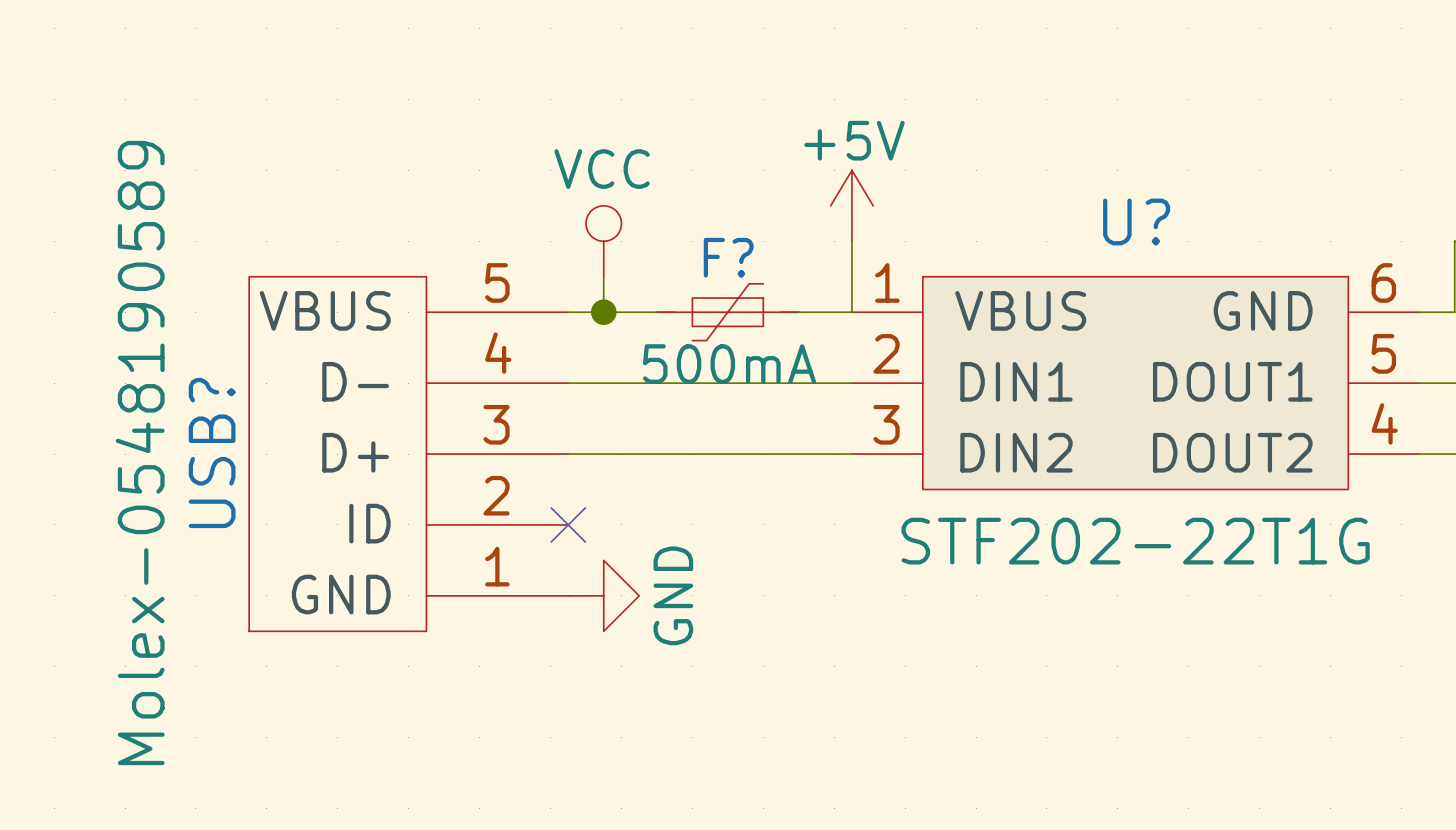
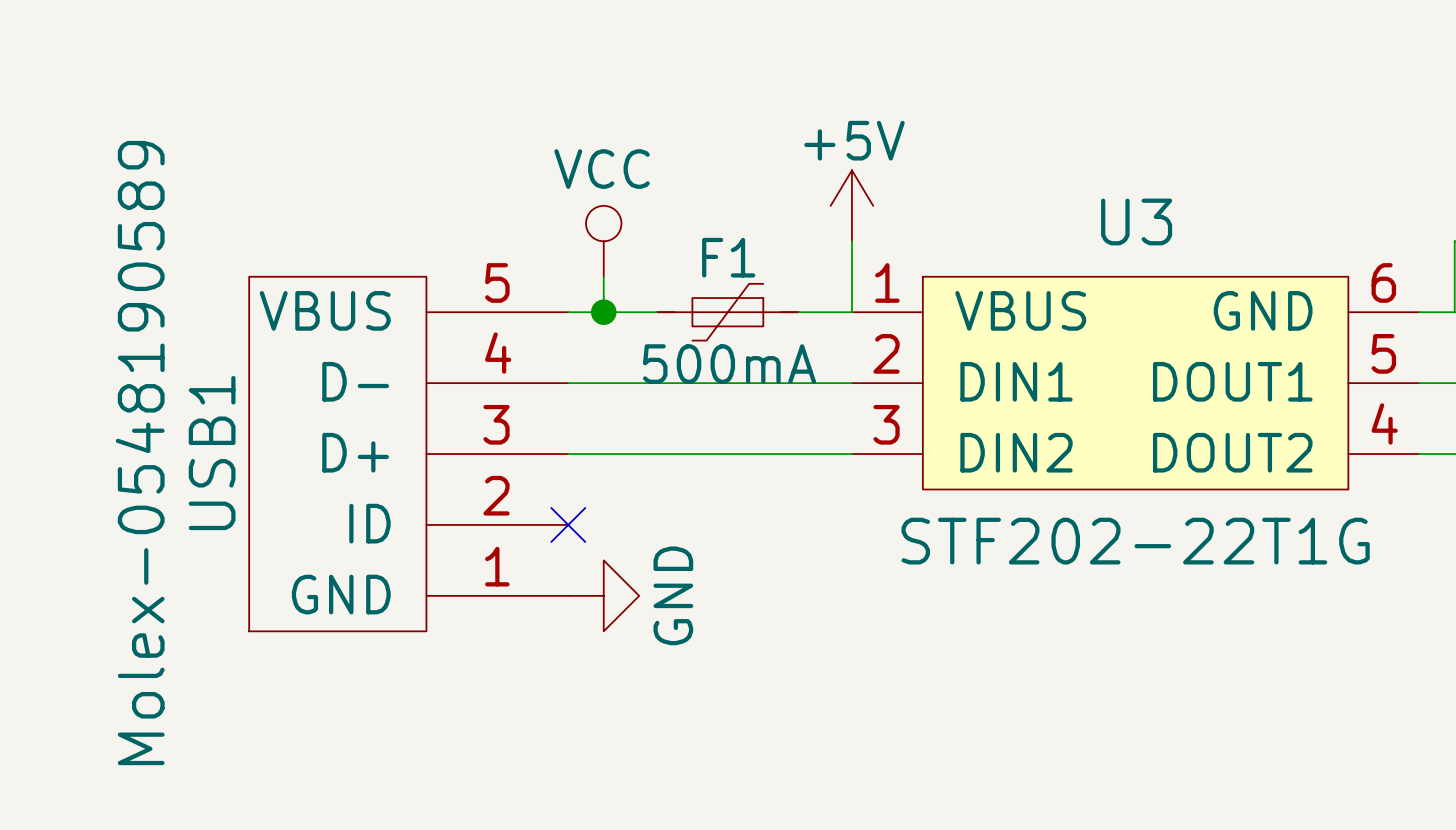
U? name: U? (1136, 221) -> U3 (1136, 221)
F? name: F? (728, 257) -> F1 (728, 257)
USB? name: USB? (212, 453) -> USB1 (212, 453)

